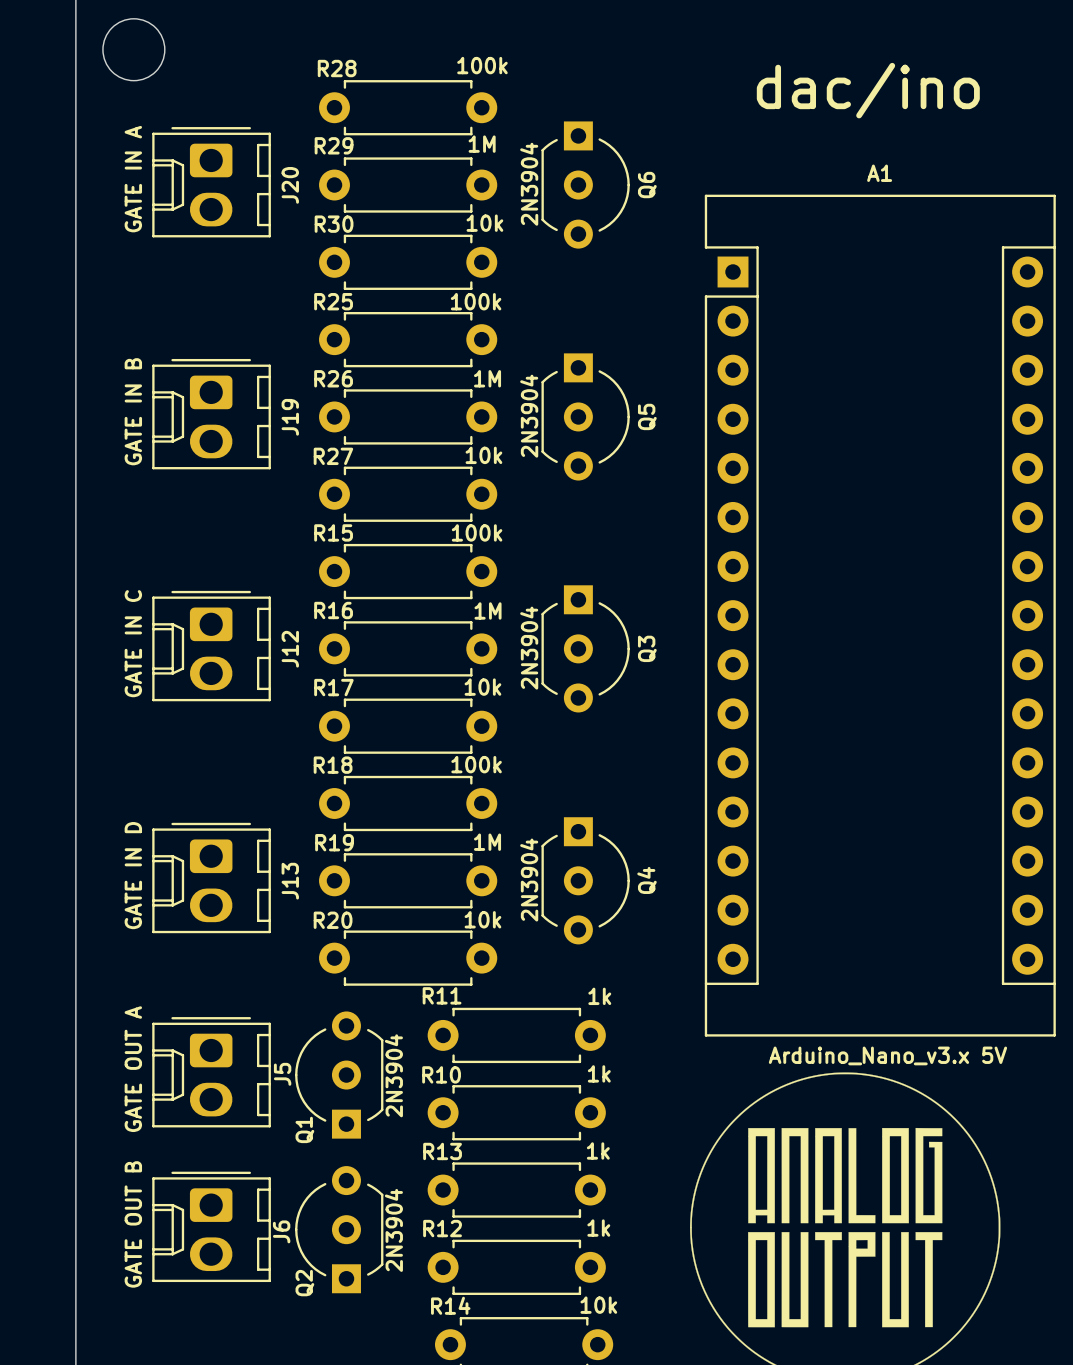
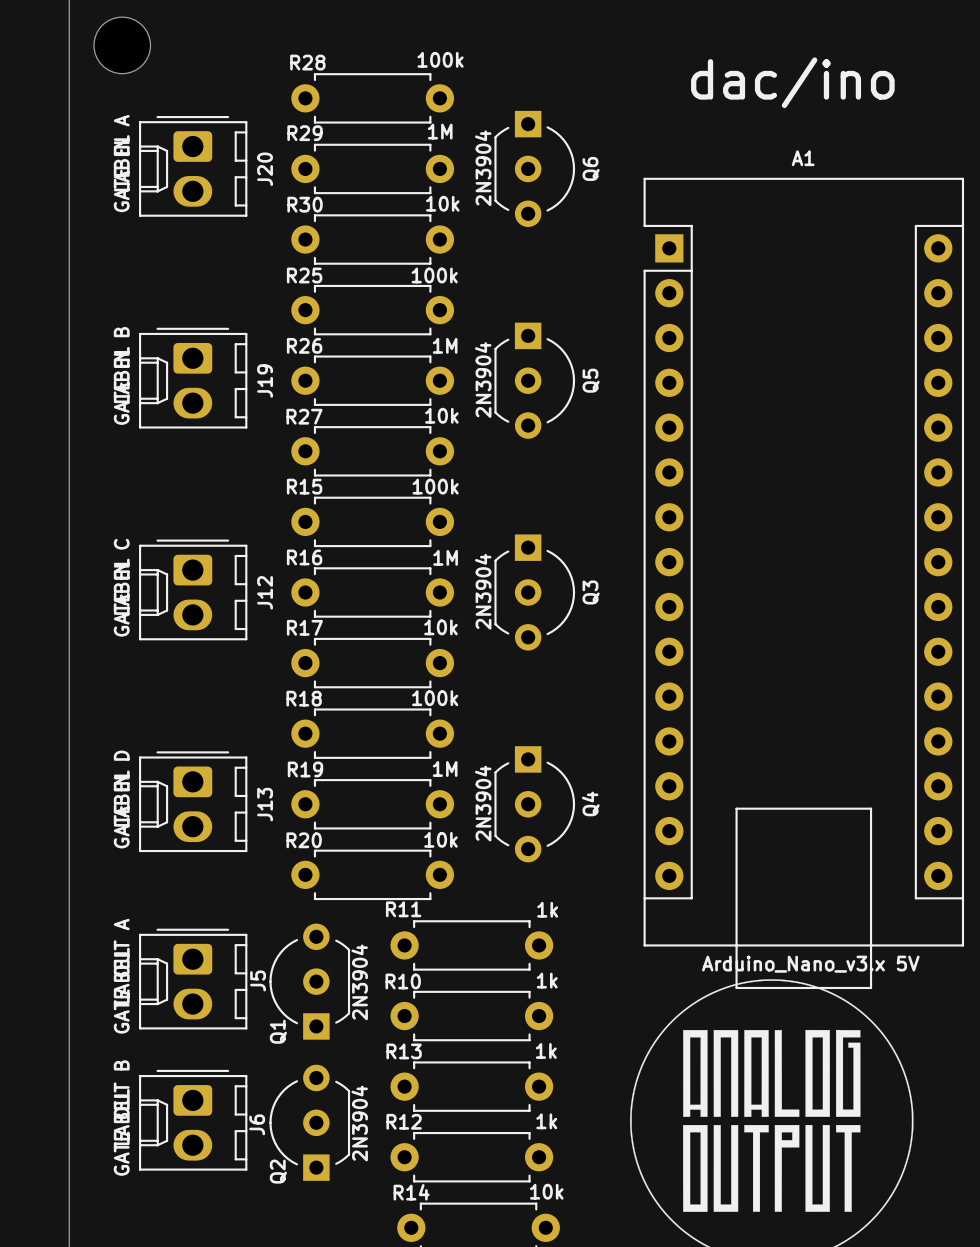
J20 footprint: [152, 127, 271, 238] -> [139, 116, 248, 217]
A1 footprint: [704, 194, 1056, 1037] -> [643, 177, 965, 990]
J19 footprint: [152, 358, 271, 470] -> [139, 327, 248, 429]
J12 footprint: [152, 590, 271, 702] -> [139, 539, 248, 641]
J13 footprint: [152, 822, 271, 934] -> [139, 751, 248, 853]
J5 footprint: [152, 1017, 271, 1128] -> [139, 928, 248, 1030]
J6 footprint: [152, 1171, 271, 1283] -> [139, 1069, 248, 1171]

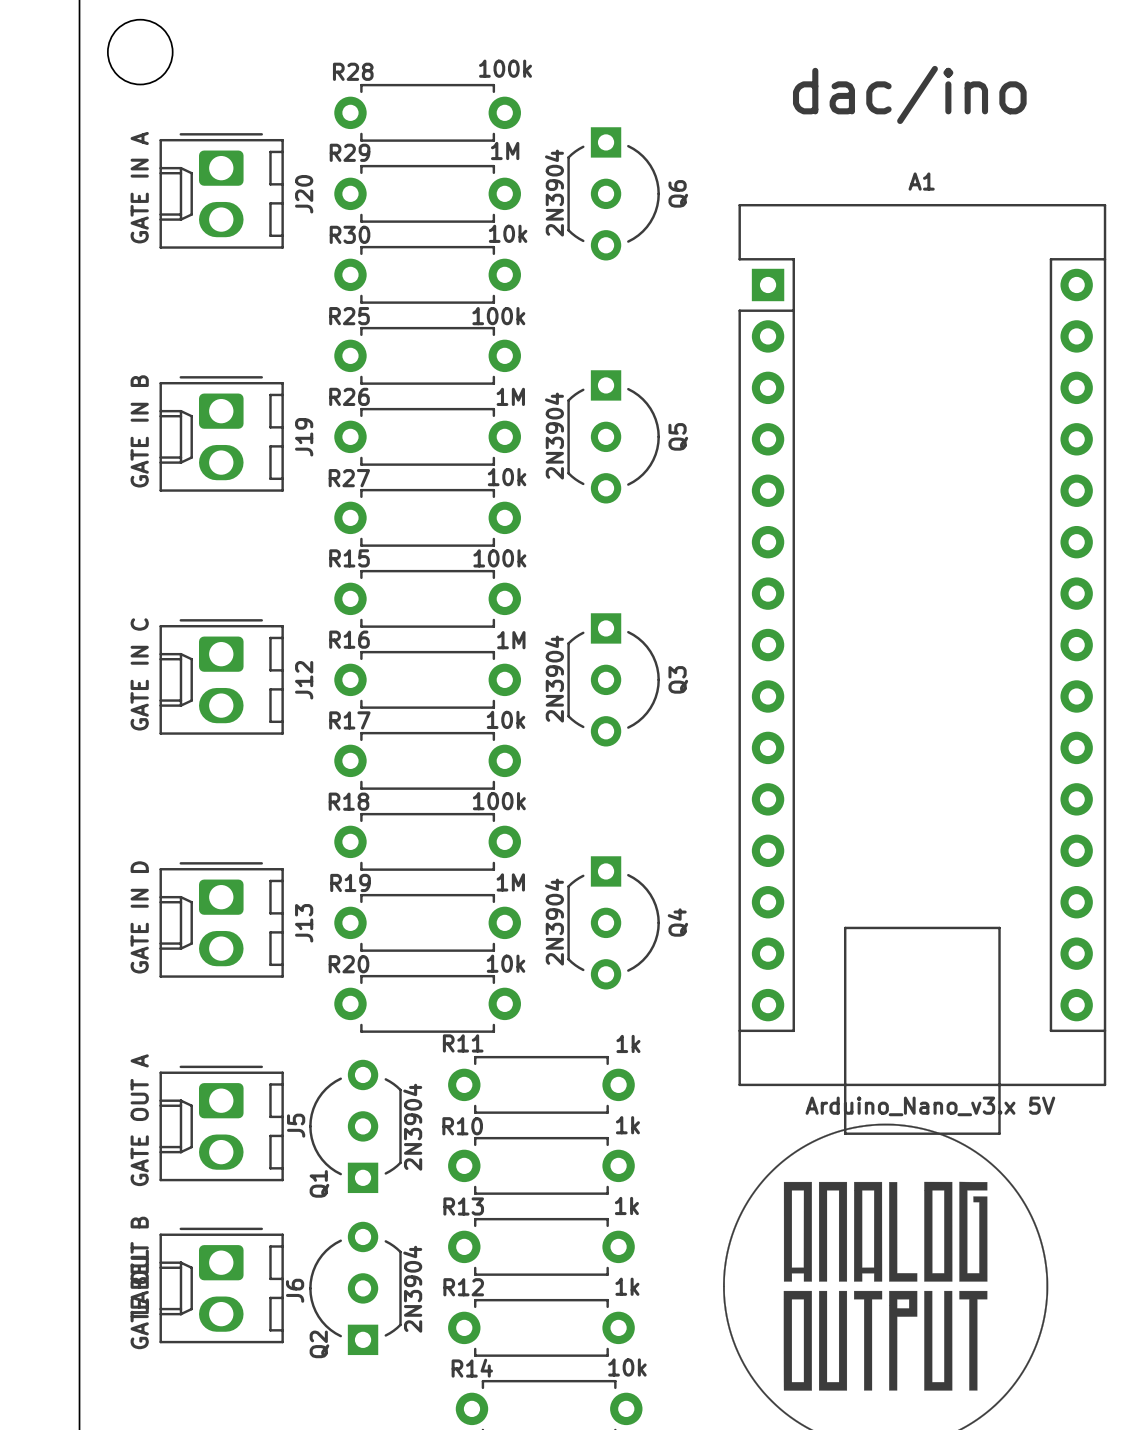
J20 footprint: [139, 116, 248, 217] -> [159, 133, 284, 249]
J19 footprint: [139, 327, 248, 429] -> [159, 376, 284, 492]
J12 footprint: [139, 539, 248, 641] -> [159, 619, 284, 735]
J13 footprint: [139, 751, 248, 853] -> [159, 862, 284, 978]
J5 footprint: [139, 928, 248, 1030] -> [159, 1065, 284, 1182]

